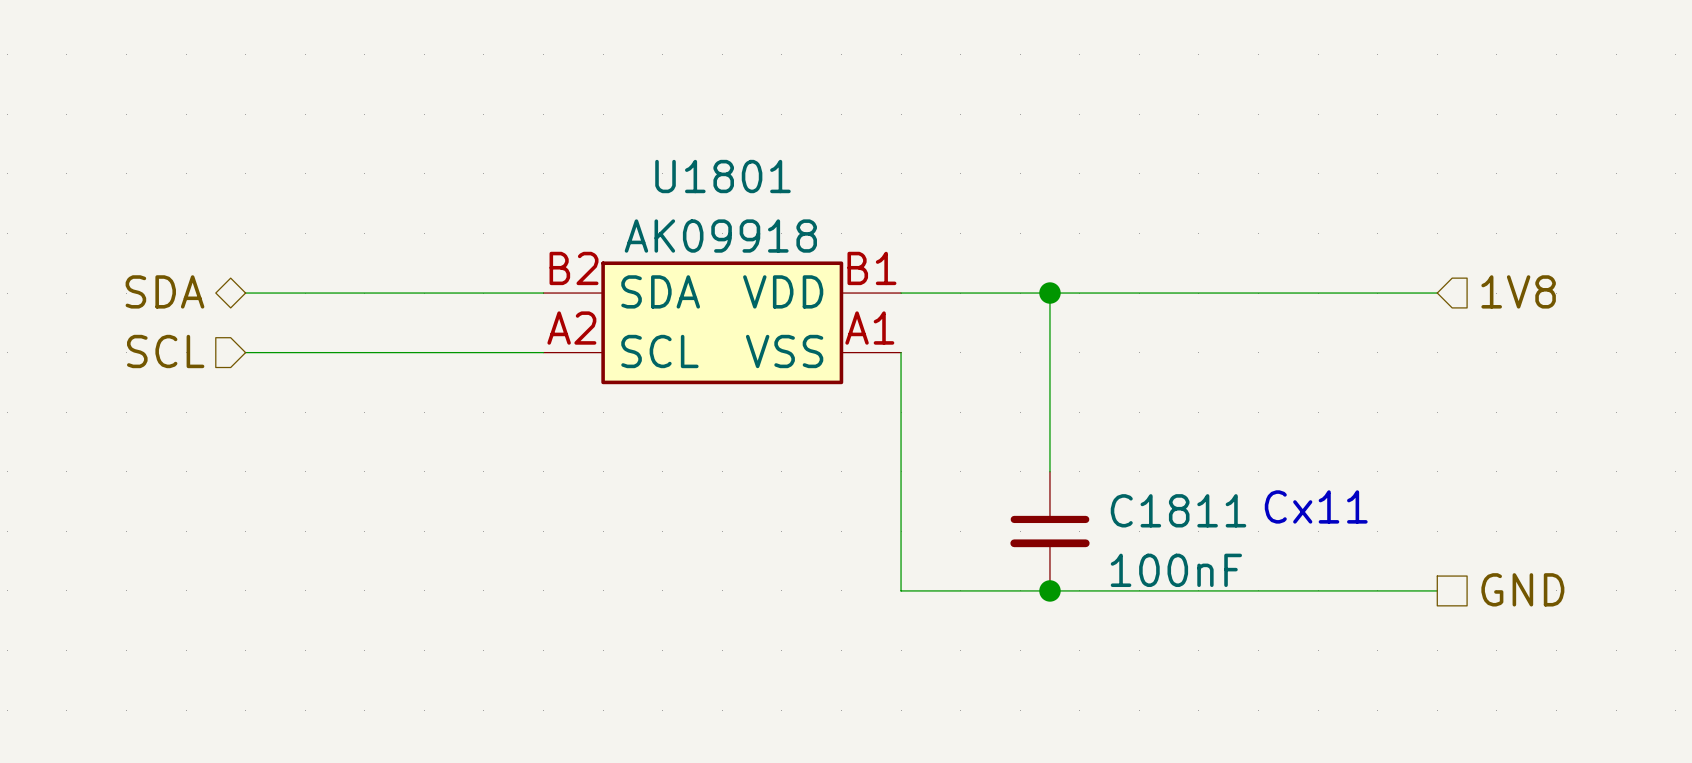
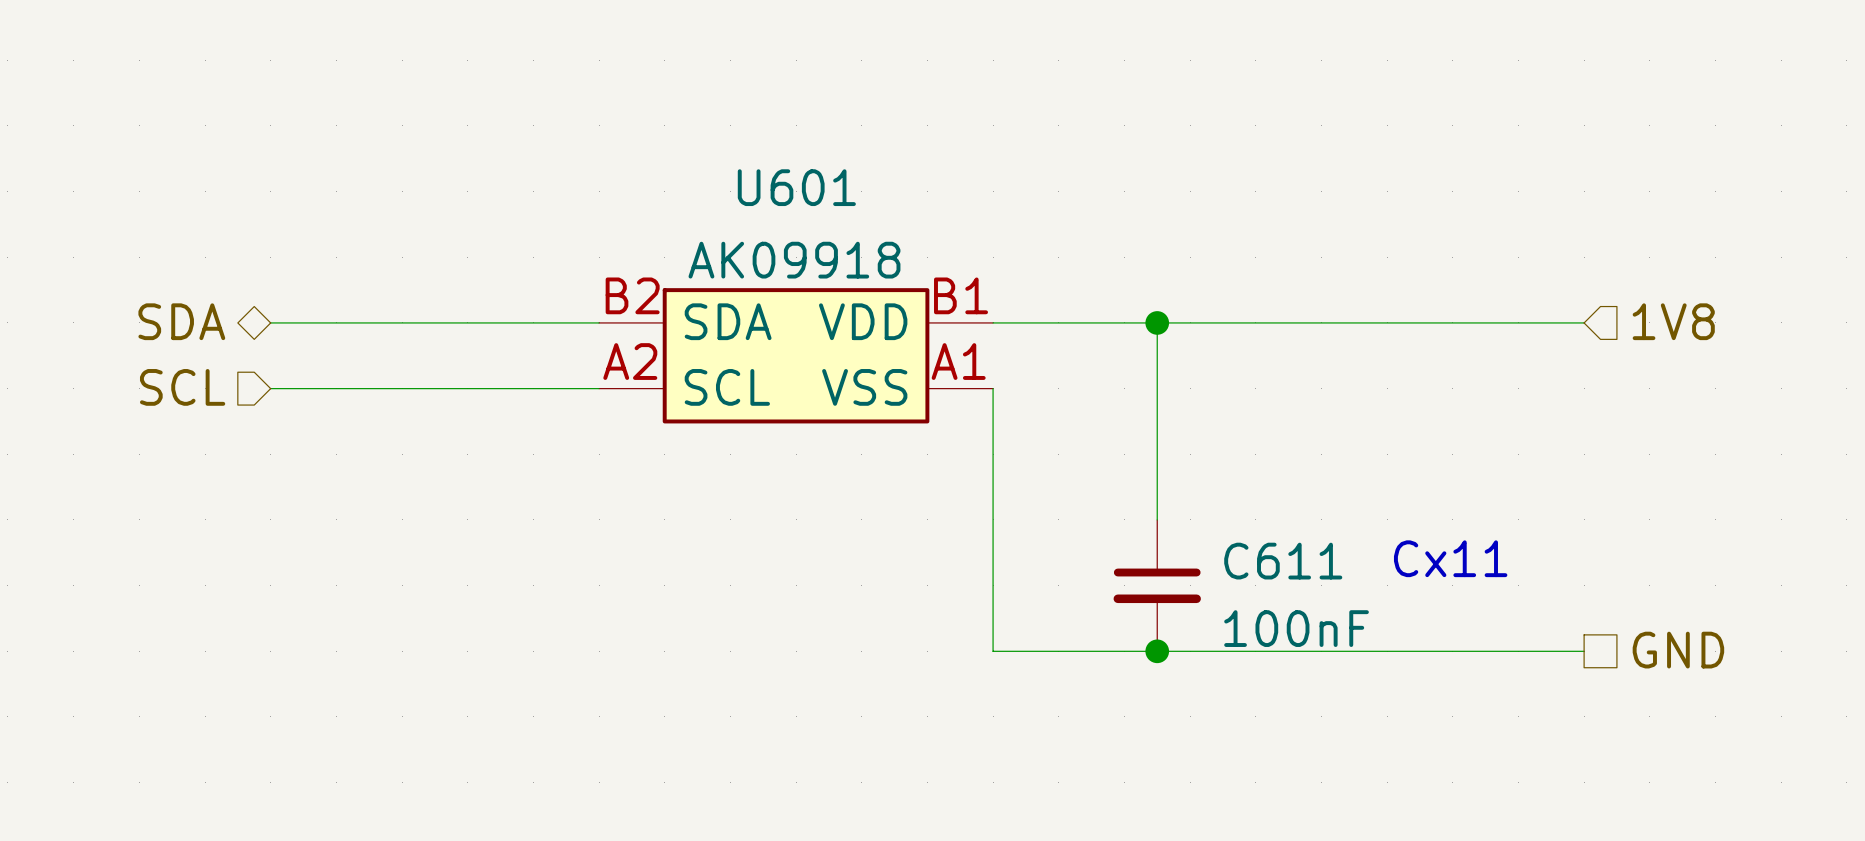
U1801 name: U1801 (722, 176) -> U601 (796, 187)
C1811 name: C1811 (1178, 510) -> C611 (1283, 561)

